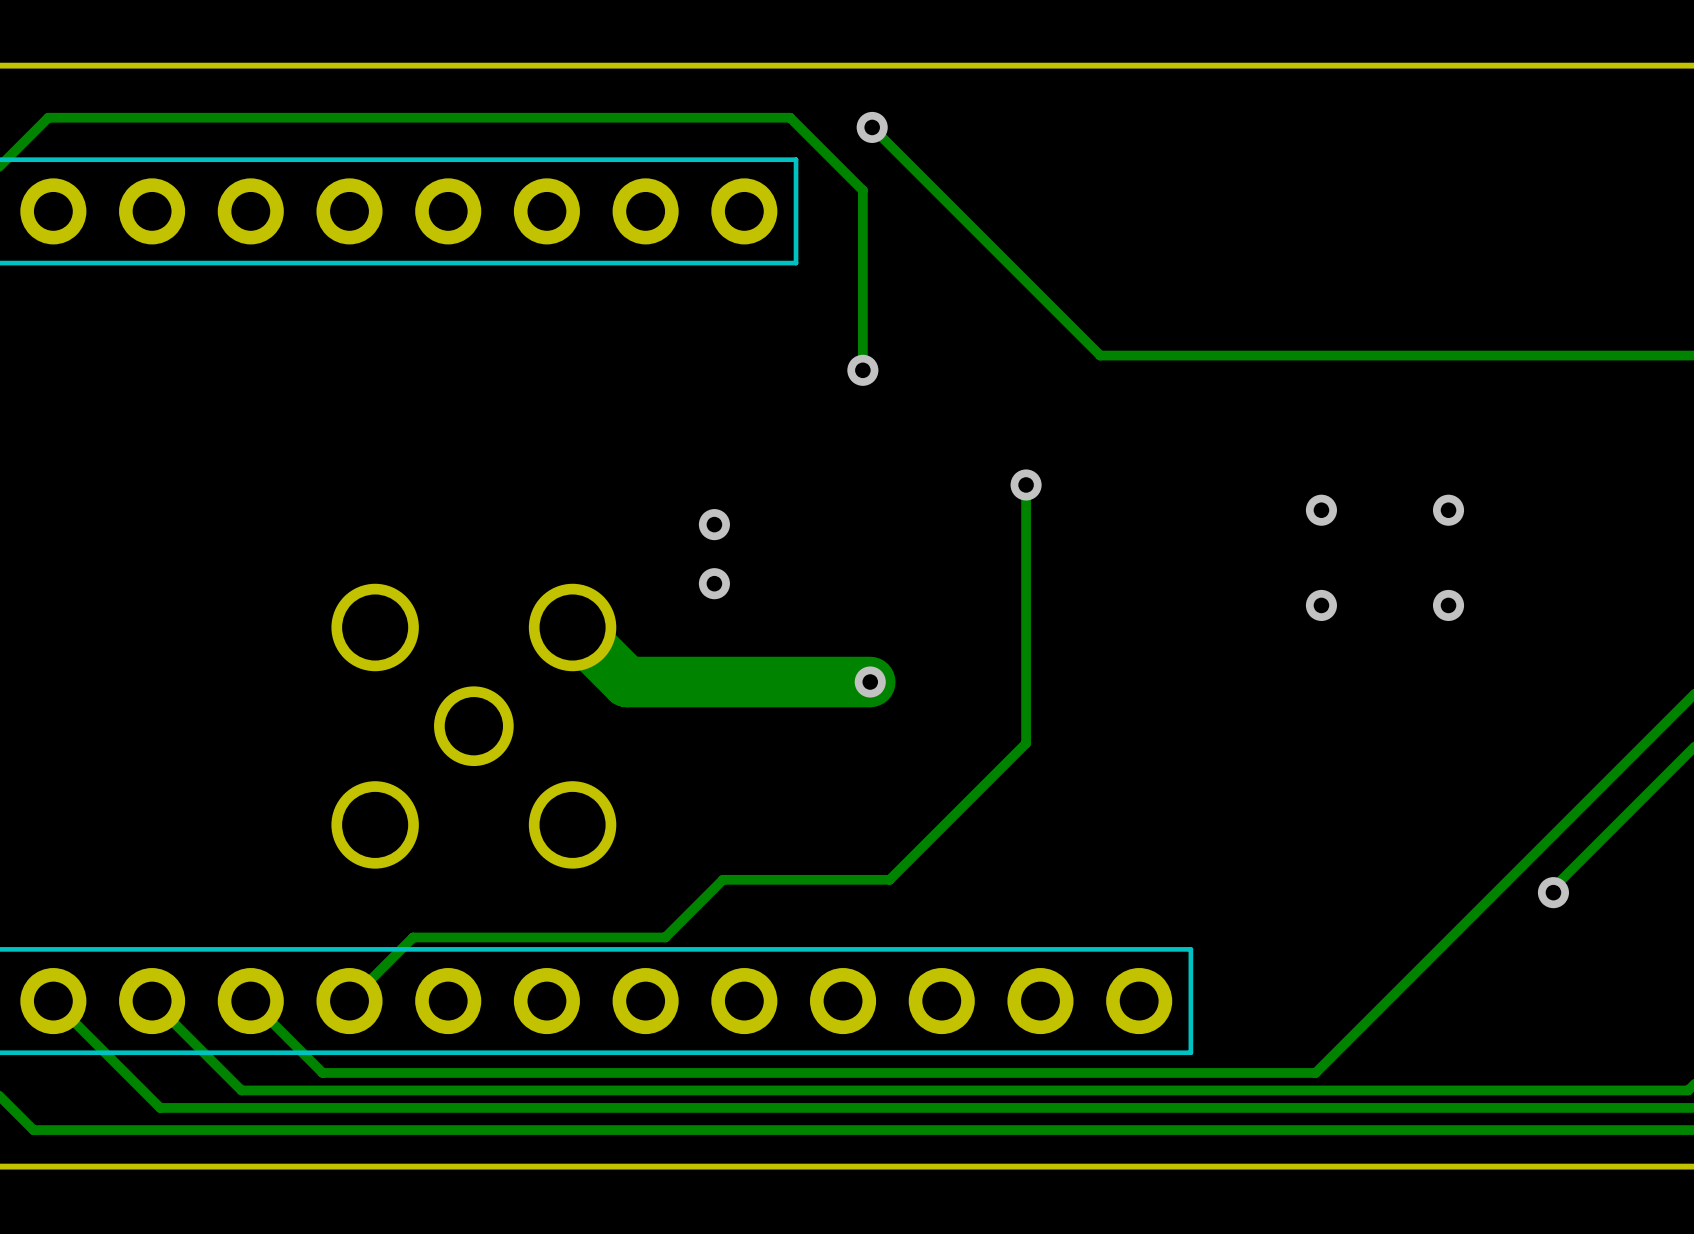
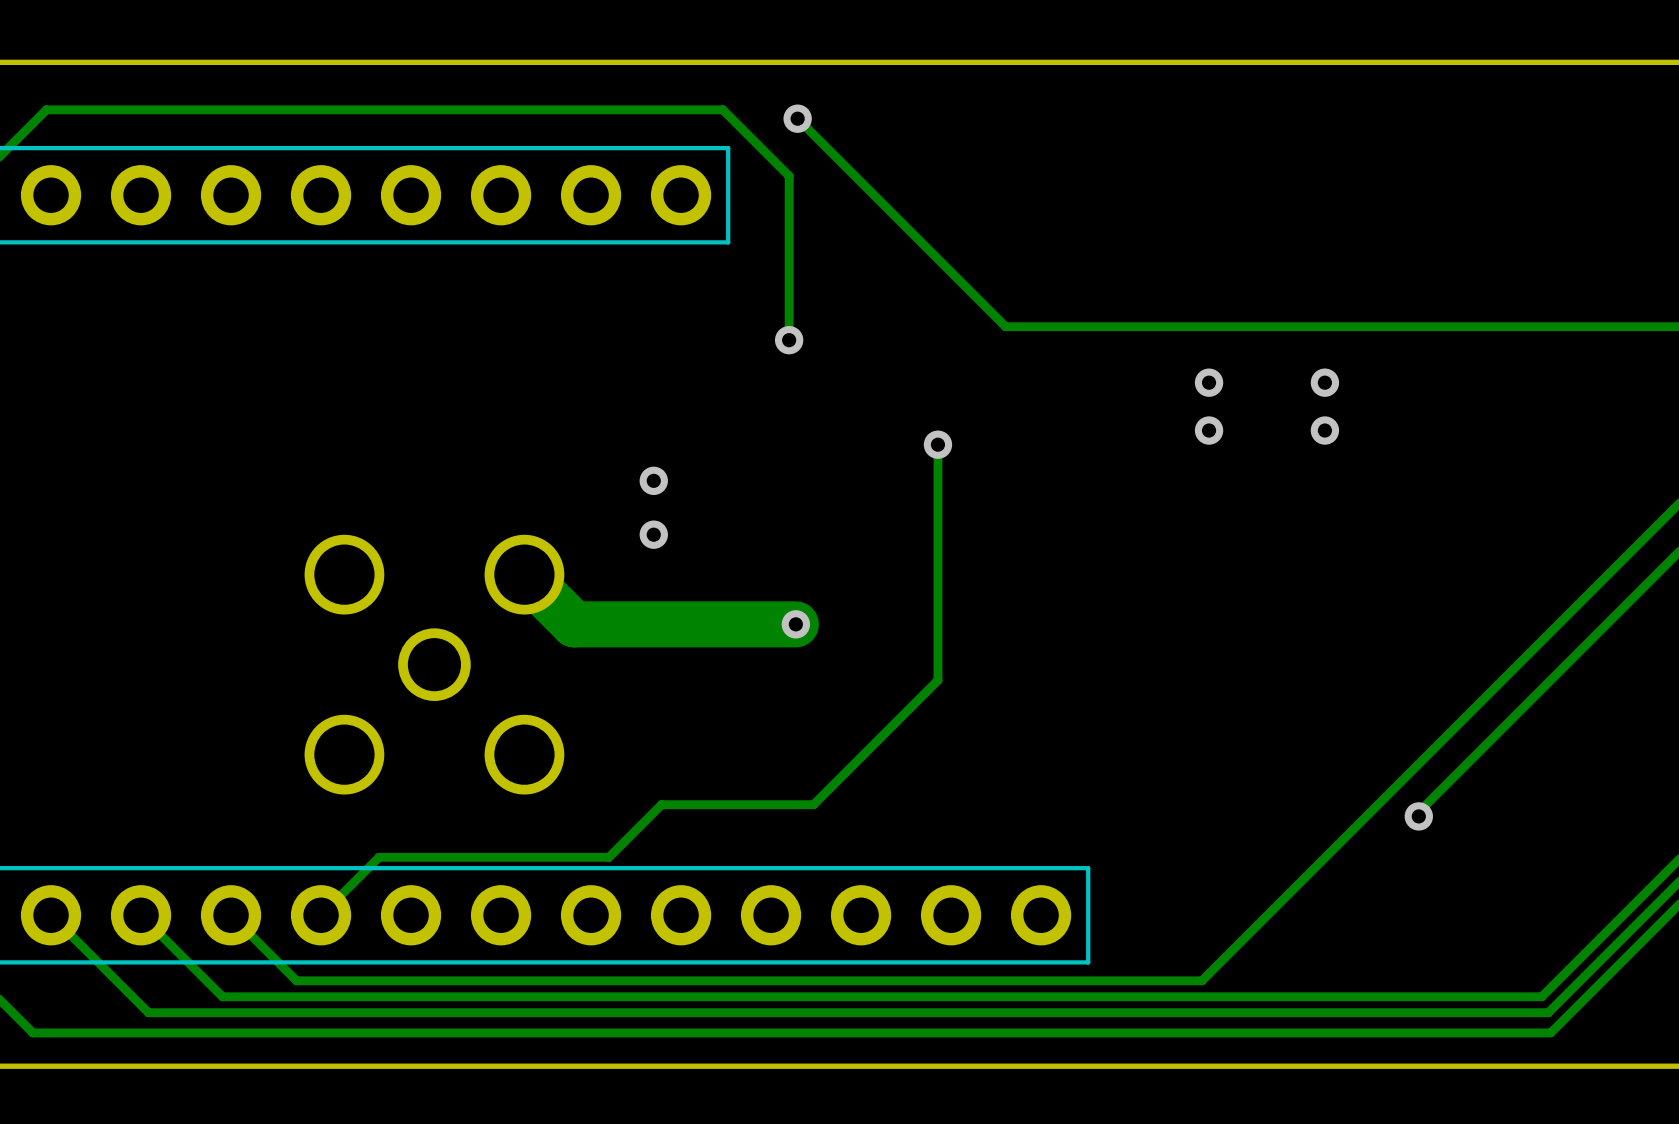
via: none -> (1209, 382)
via: none -> (1324, 382)
via position: (1321, 510) -> (1209, 430)
via position: (1448, 510) -> (1324, 430)
via: (1321, 605) -> none
via: (1448, 605) -> none

